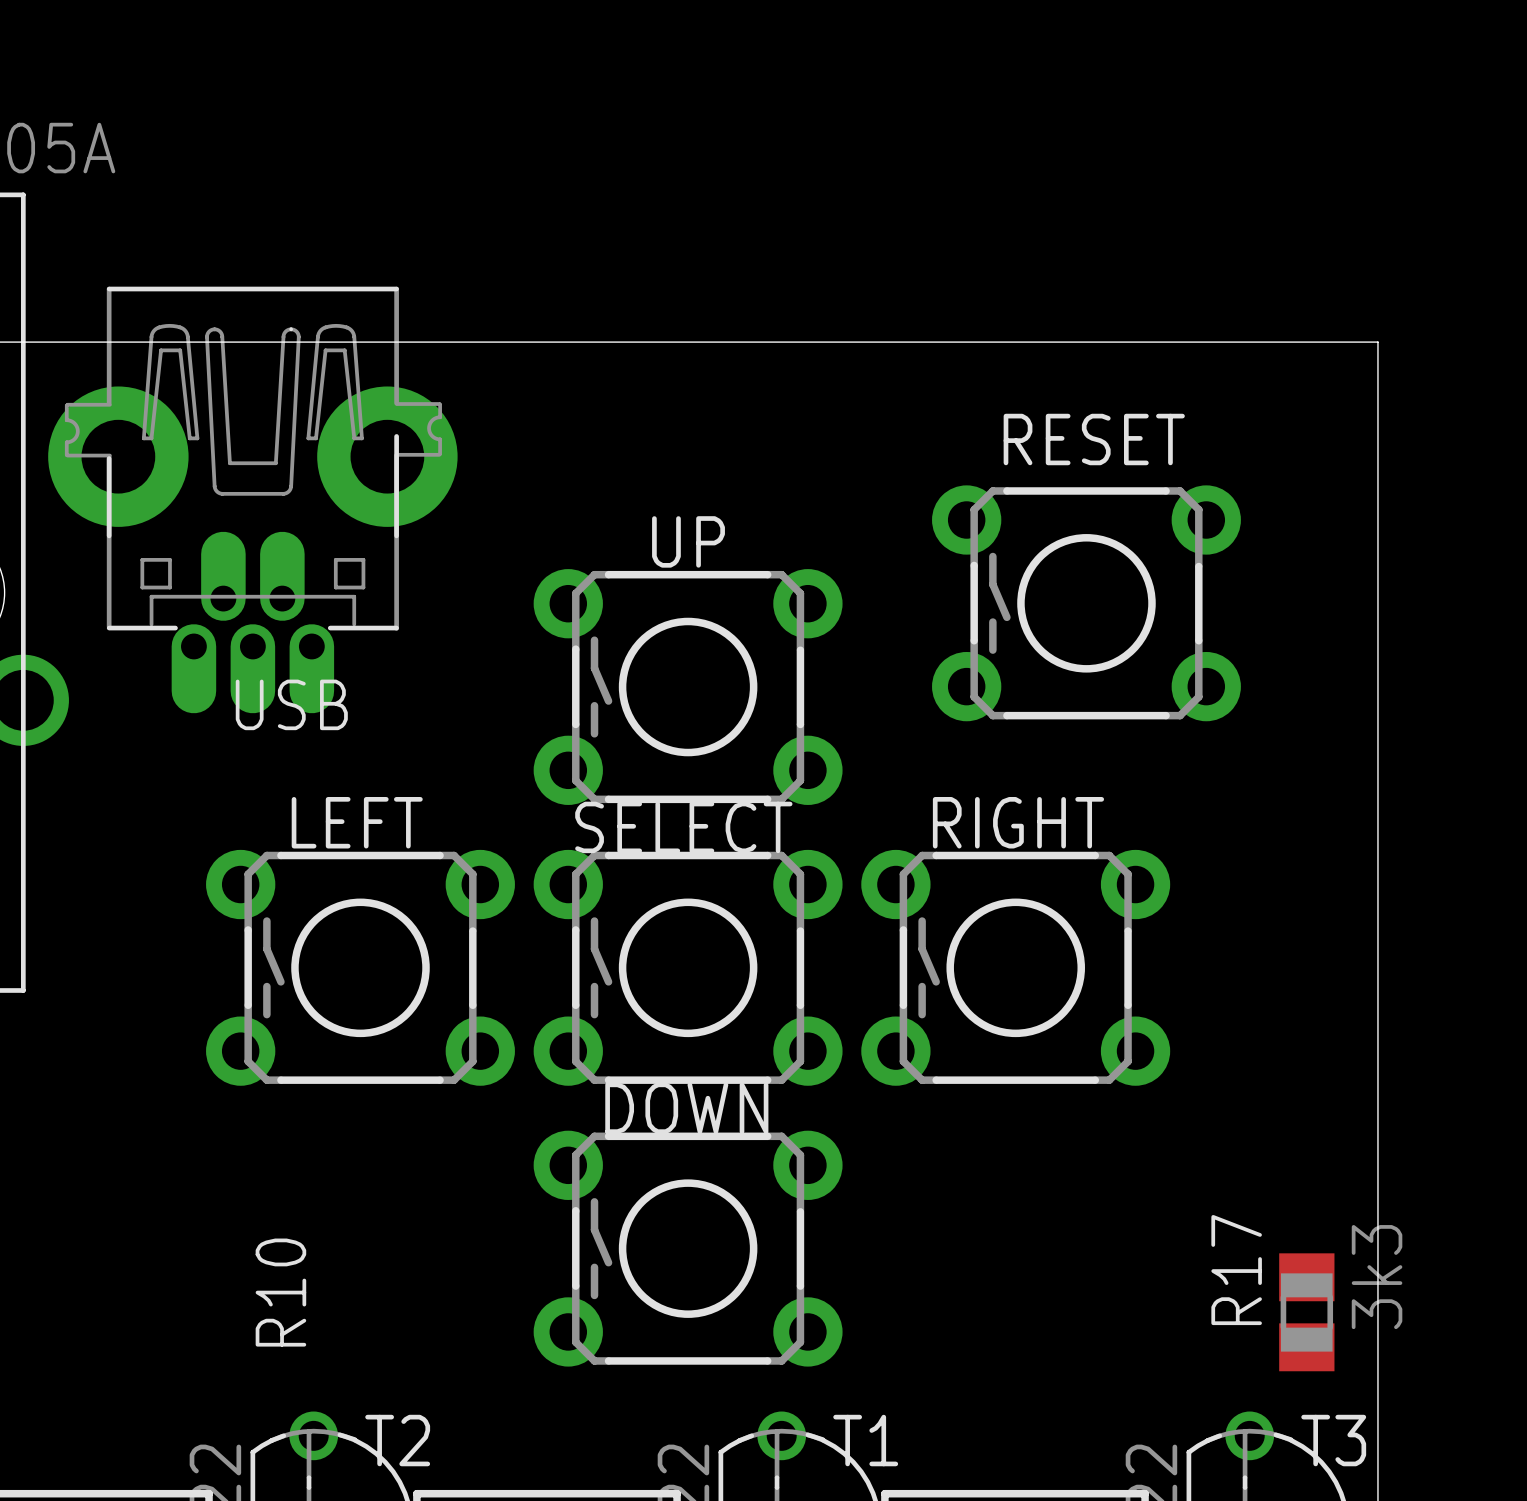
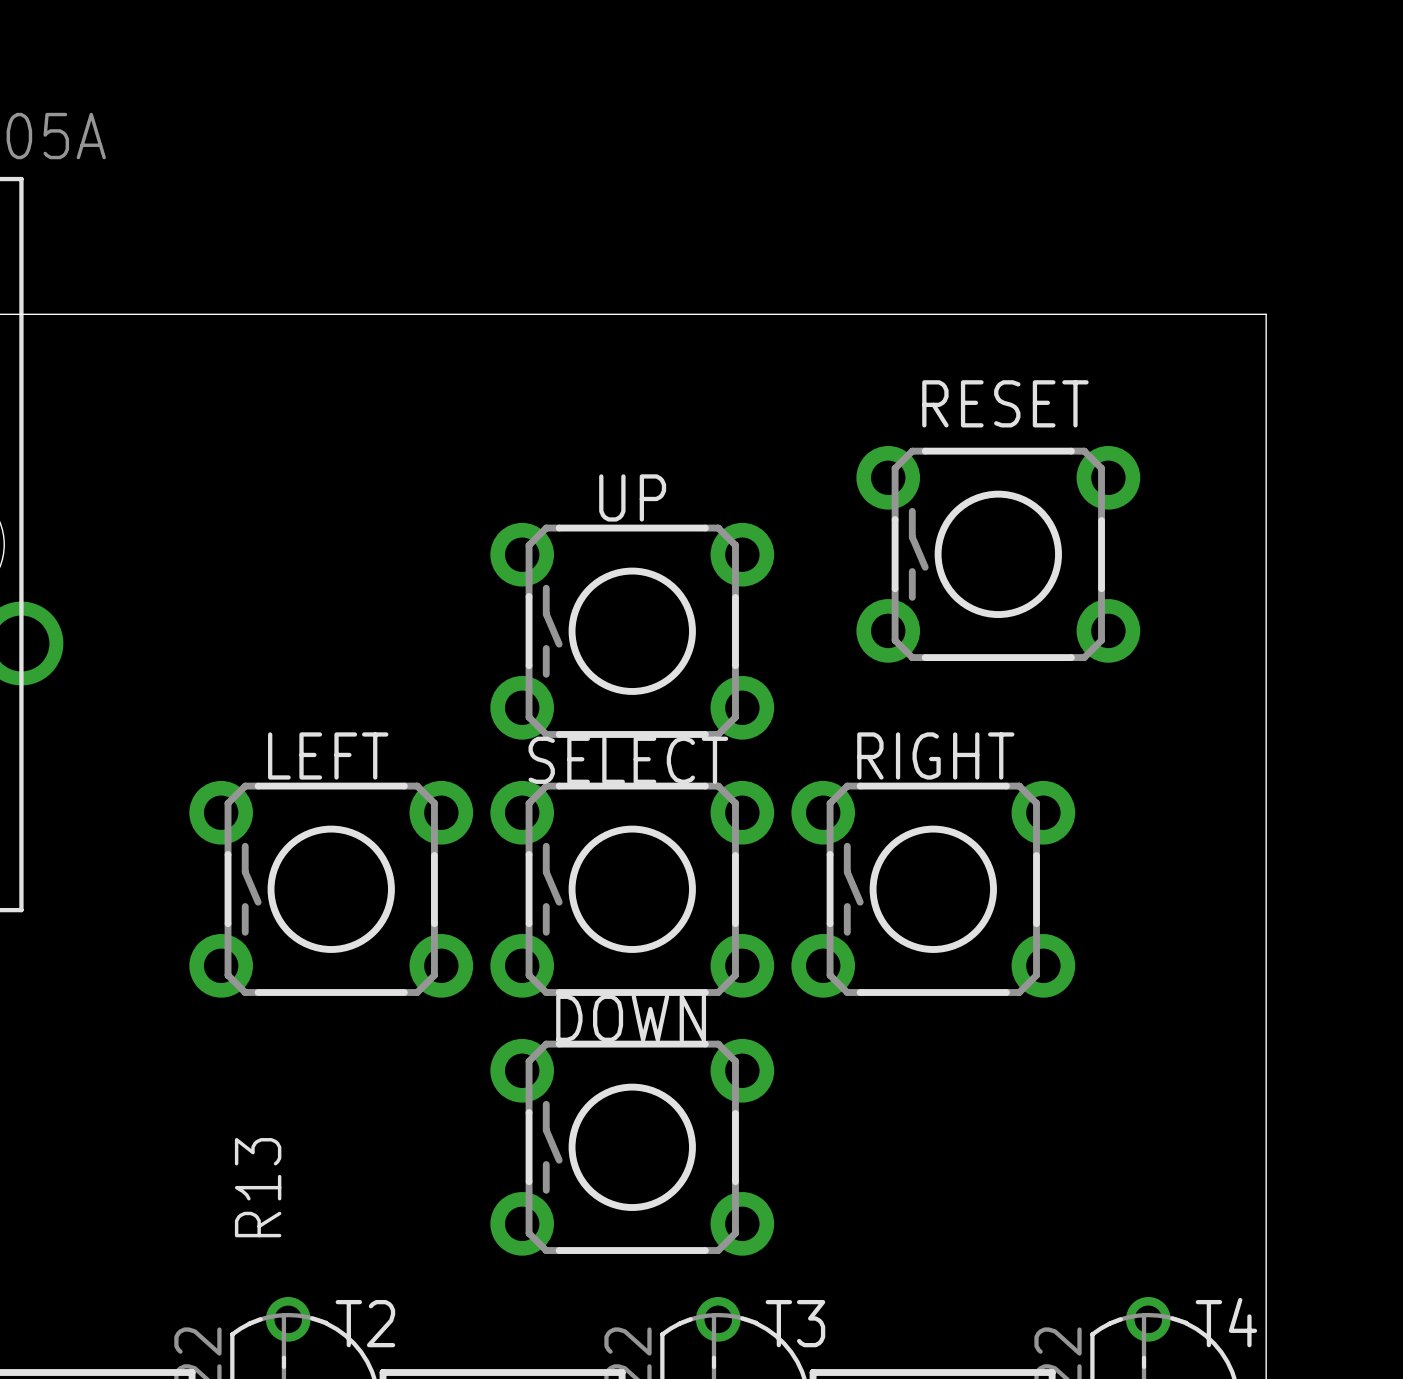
USB: (252, 499) -> none
R10 name: R10 (280, 1292) -> R13 (258, 1187)
R17: 3k3 (1306, 1312) -> none
T1 name: T1 (865, 1440) -> T3 (795, 1323)
T3 name: T3 (1333, 1440) -> T4 (1226, 1322)

